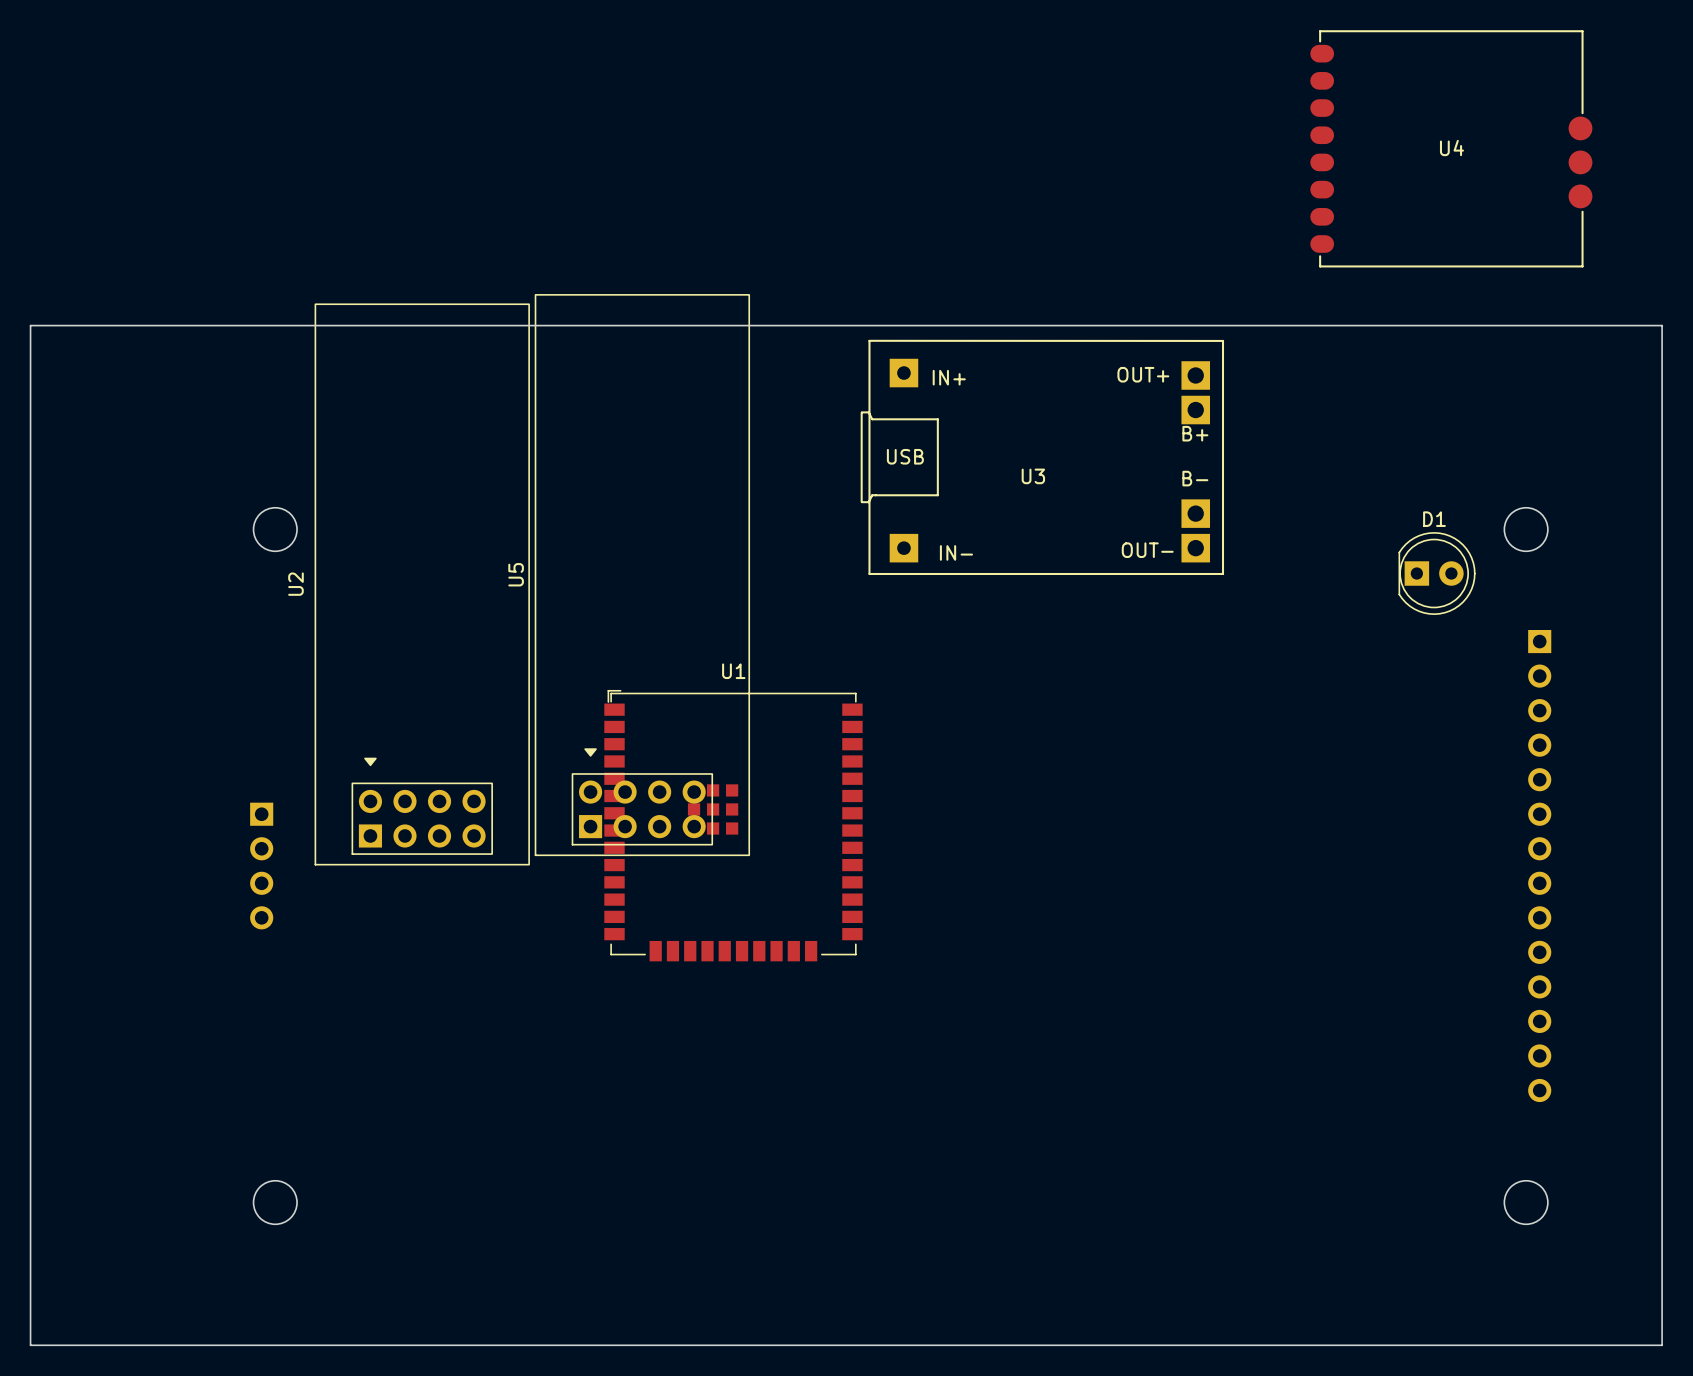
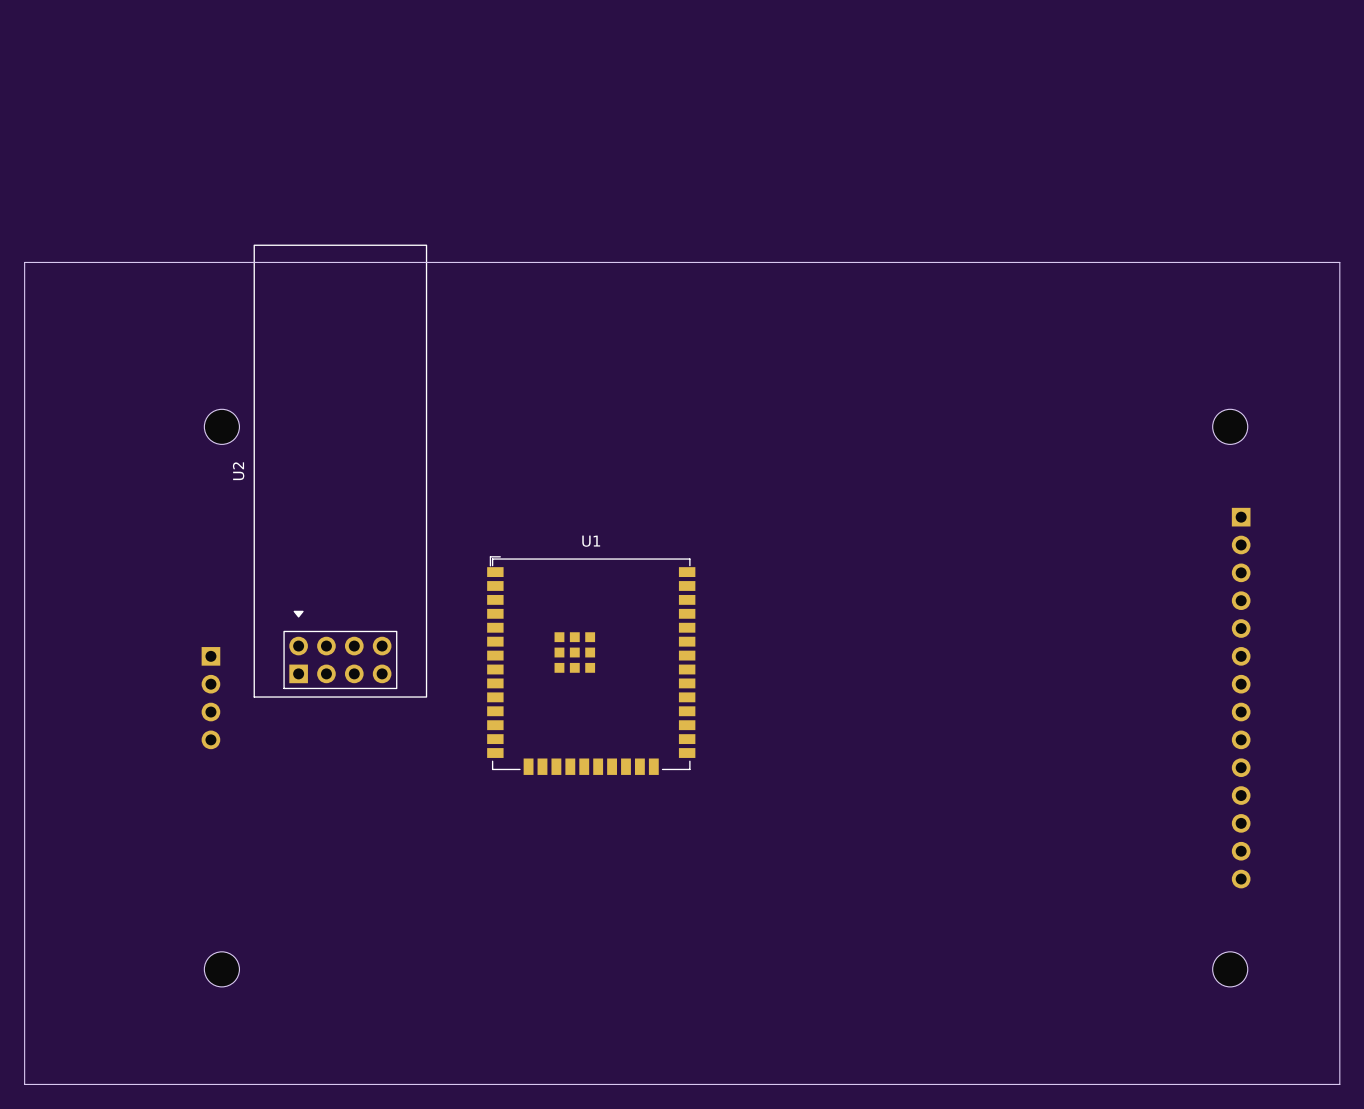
U4: (1451, 148) -> none
U3: (1042, 457) -> none
D1: (1437, 573) -> none
U5: (642, 575) -> none

